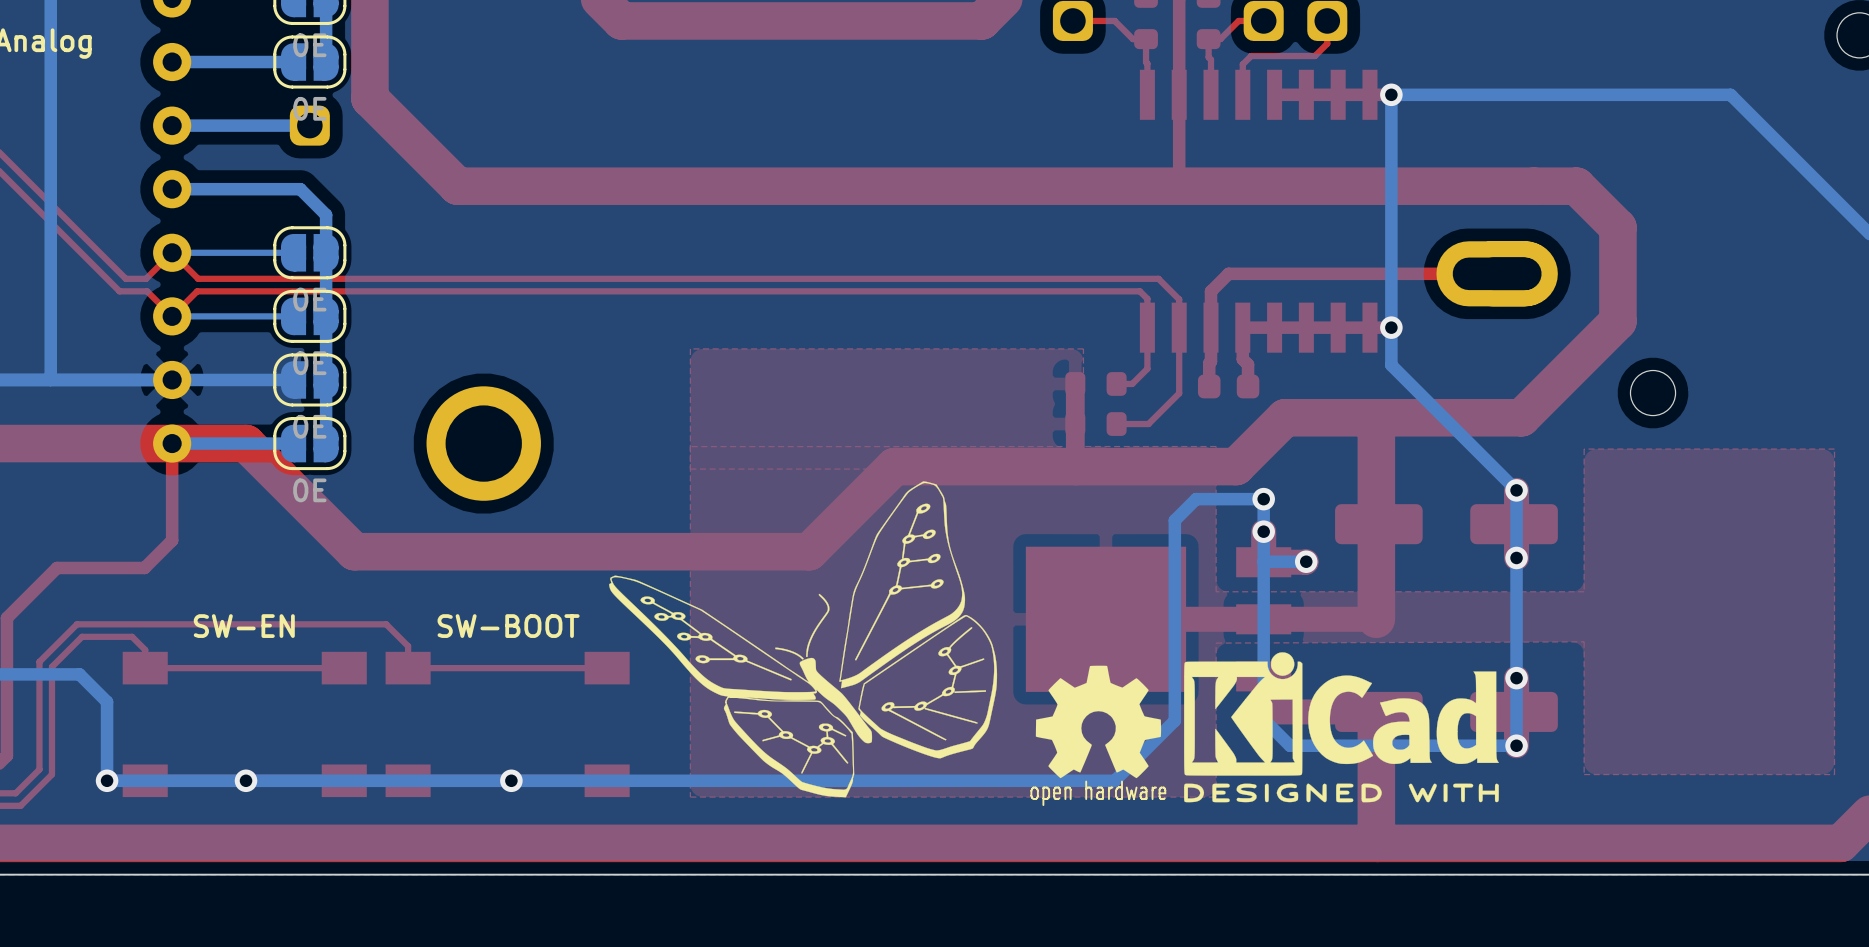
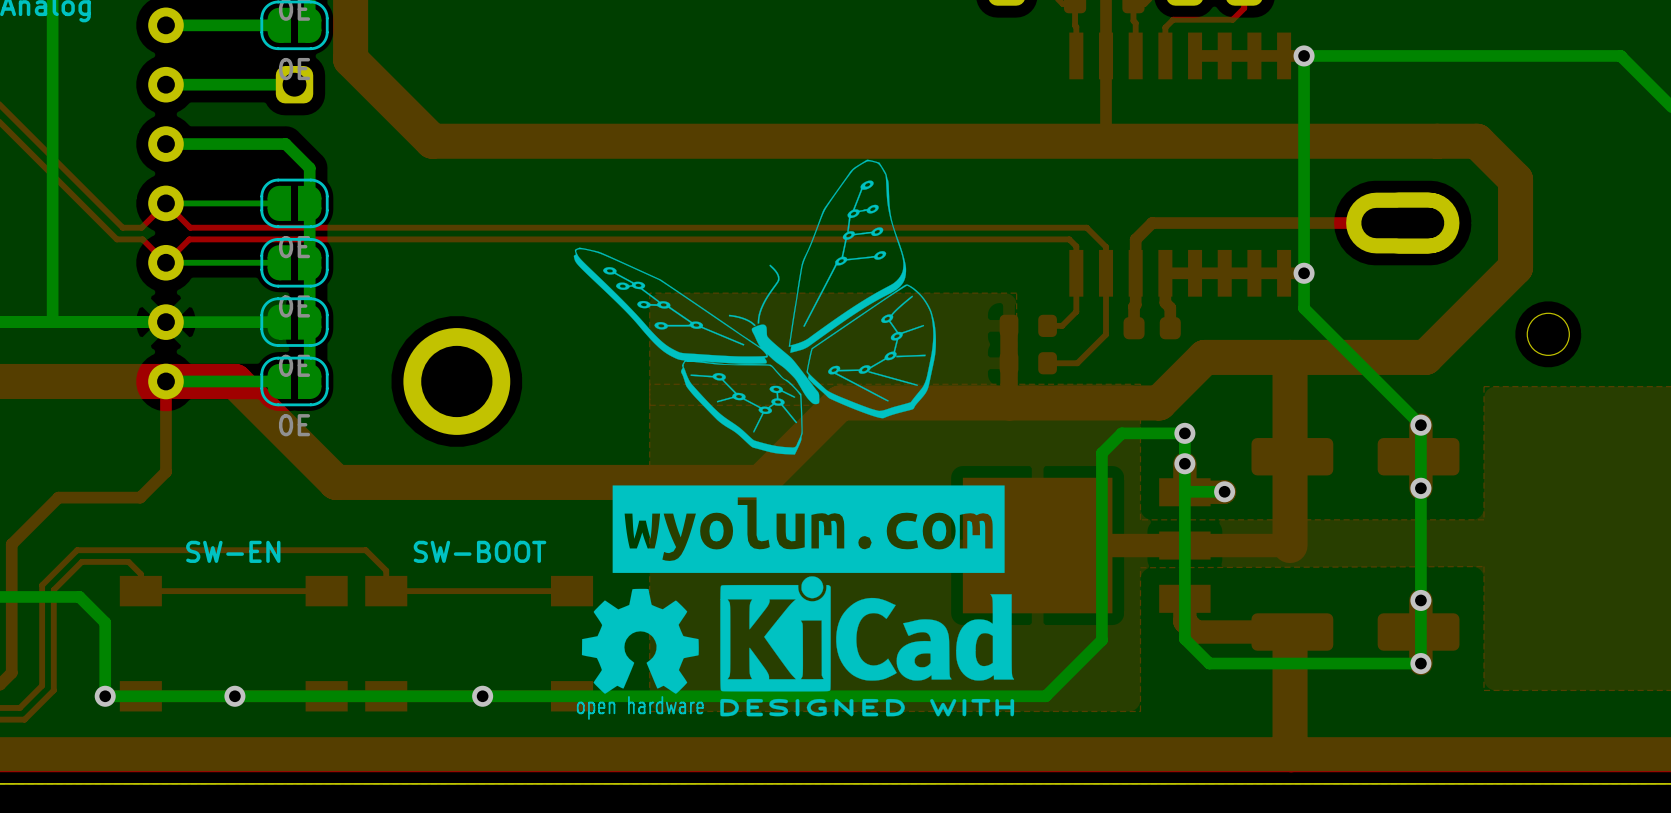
drawing: none -> [612, 485, 1005, 573]
drawing position: (803, 639) -> (754, 307)
drawing position: (1341, 727) -> (867, 646)
drawing position: (1098, 735) -> (640, 654)

